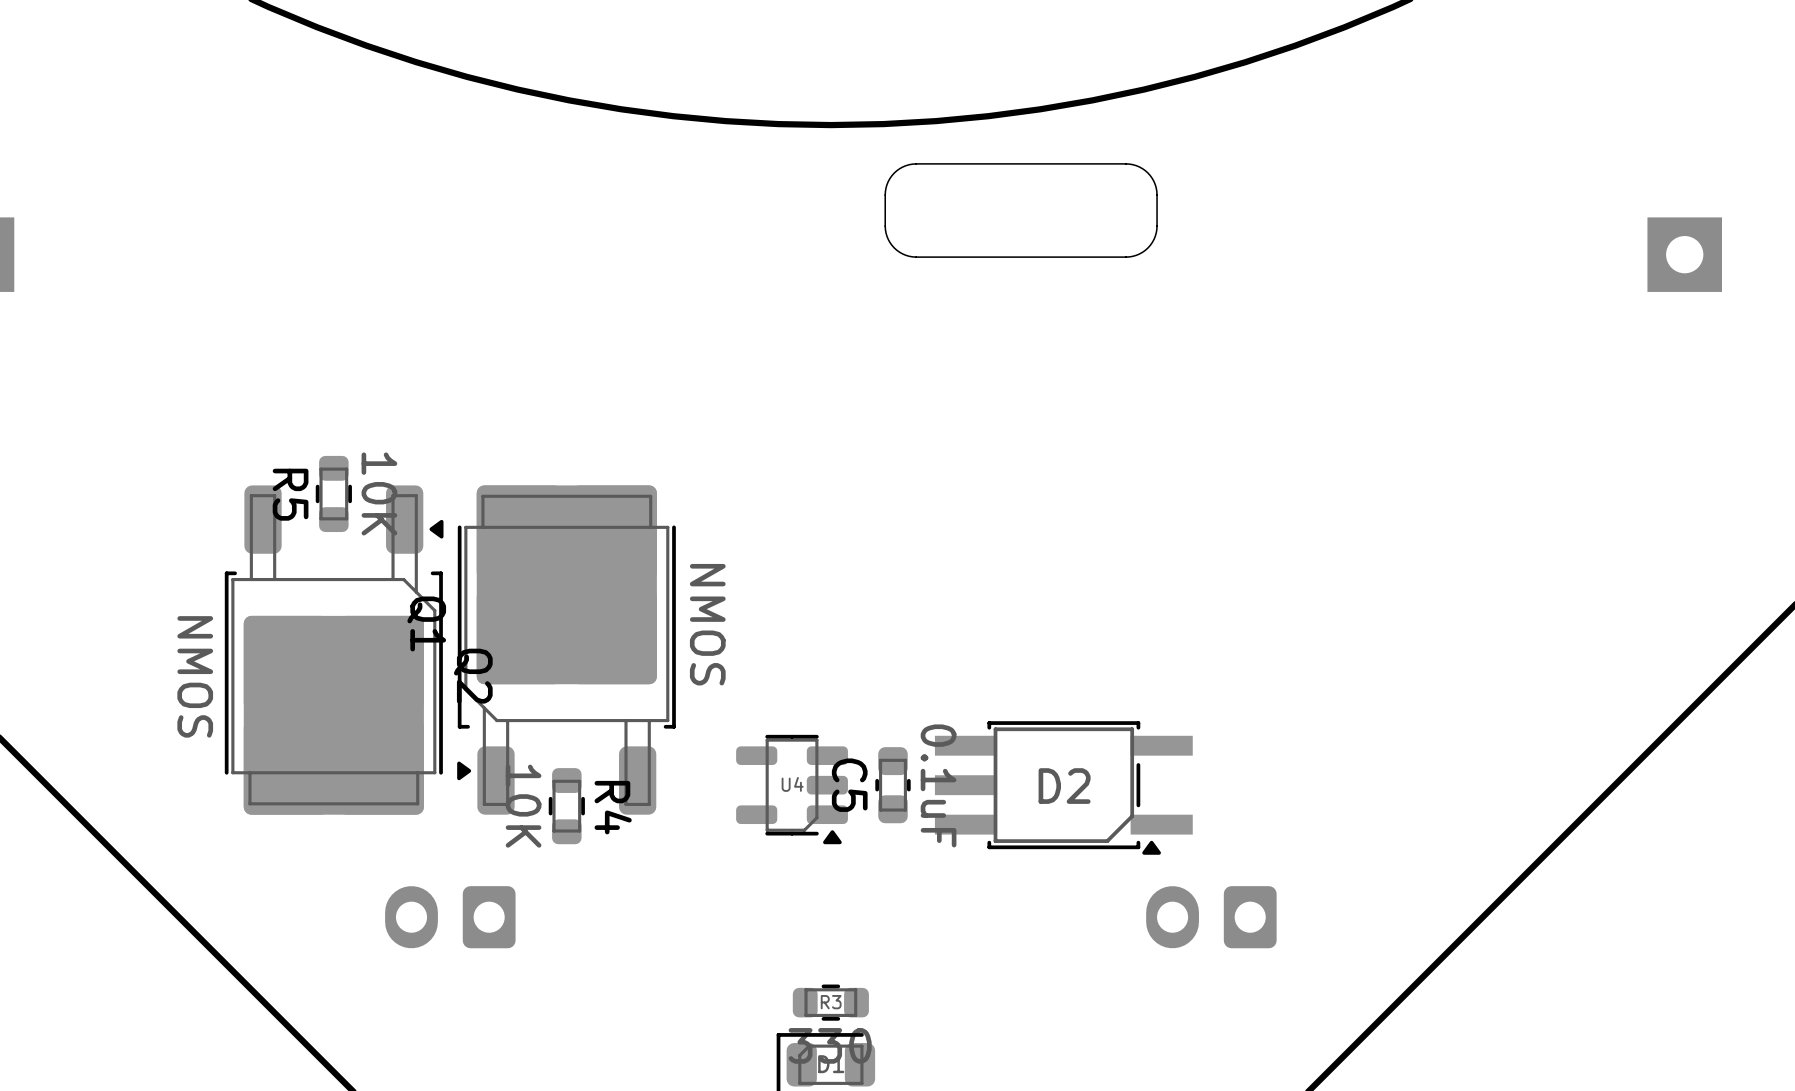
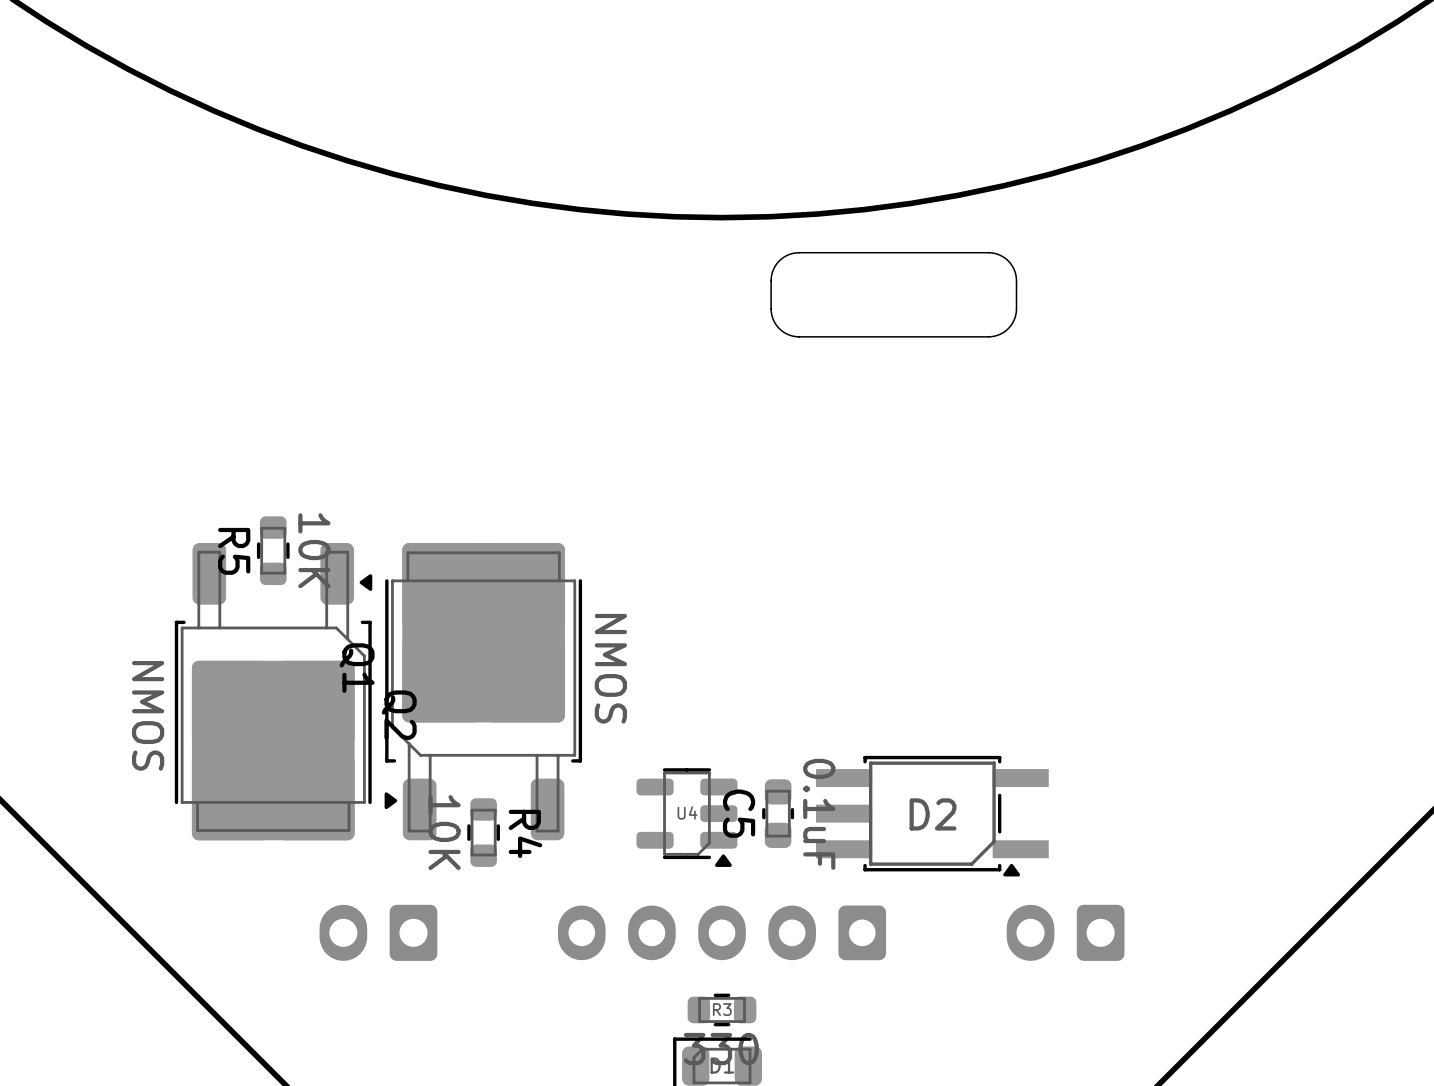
part: none -> (722, 932)

